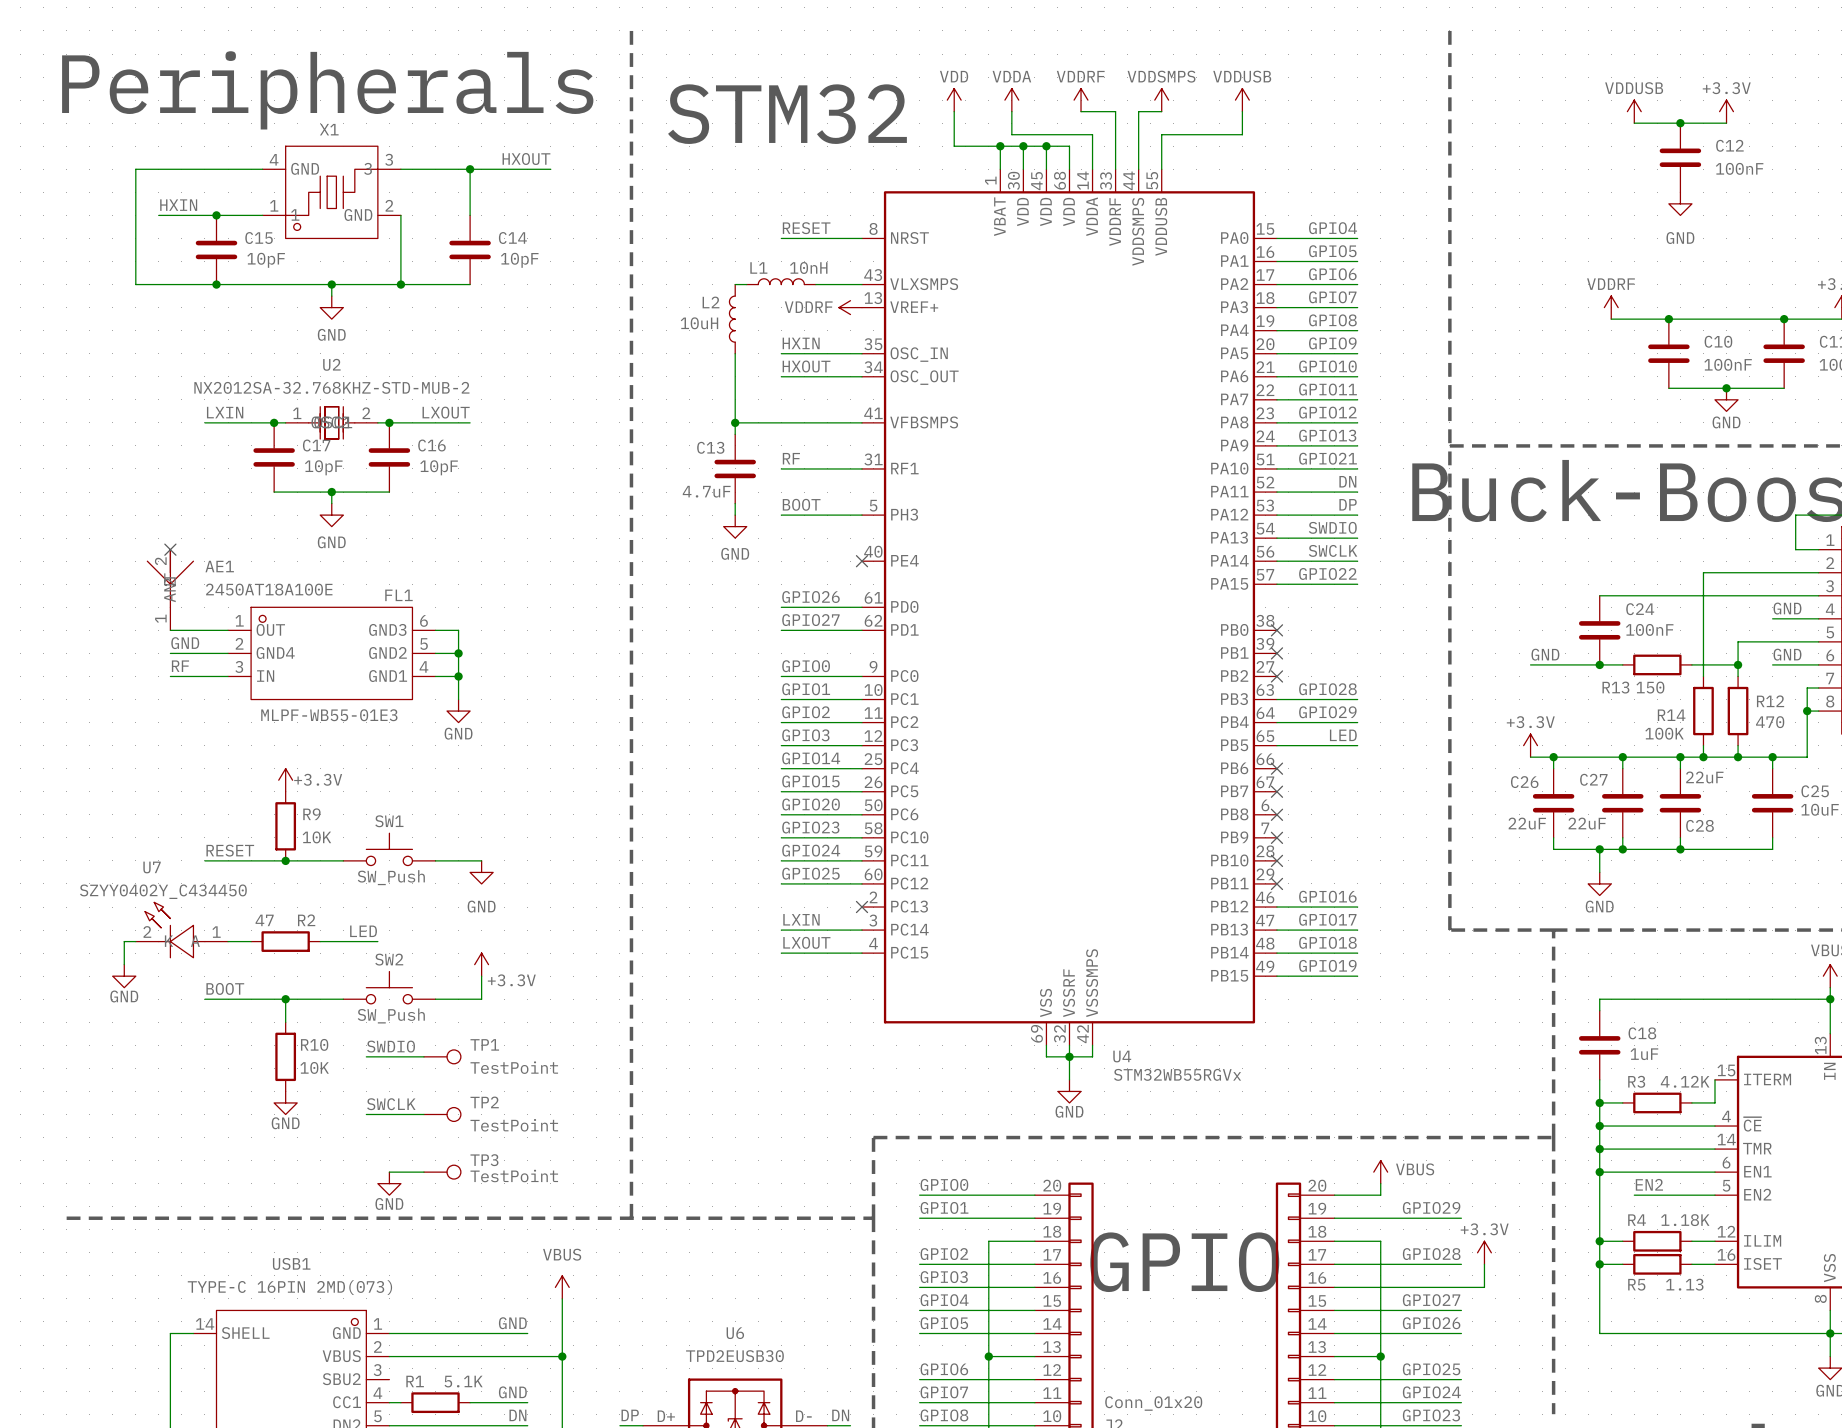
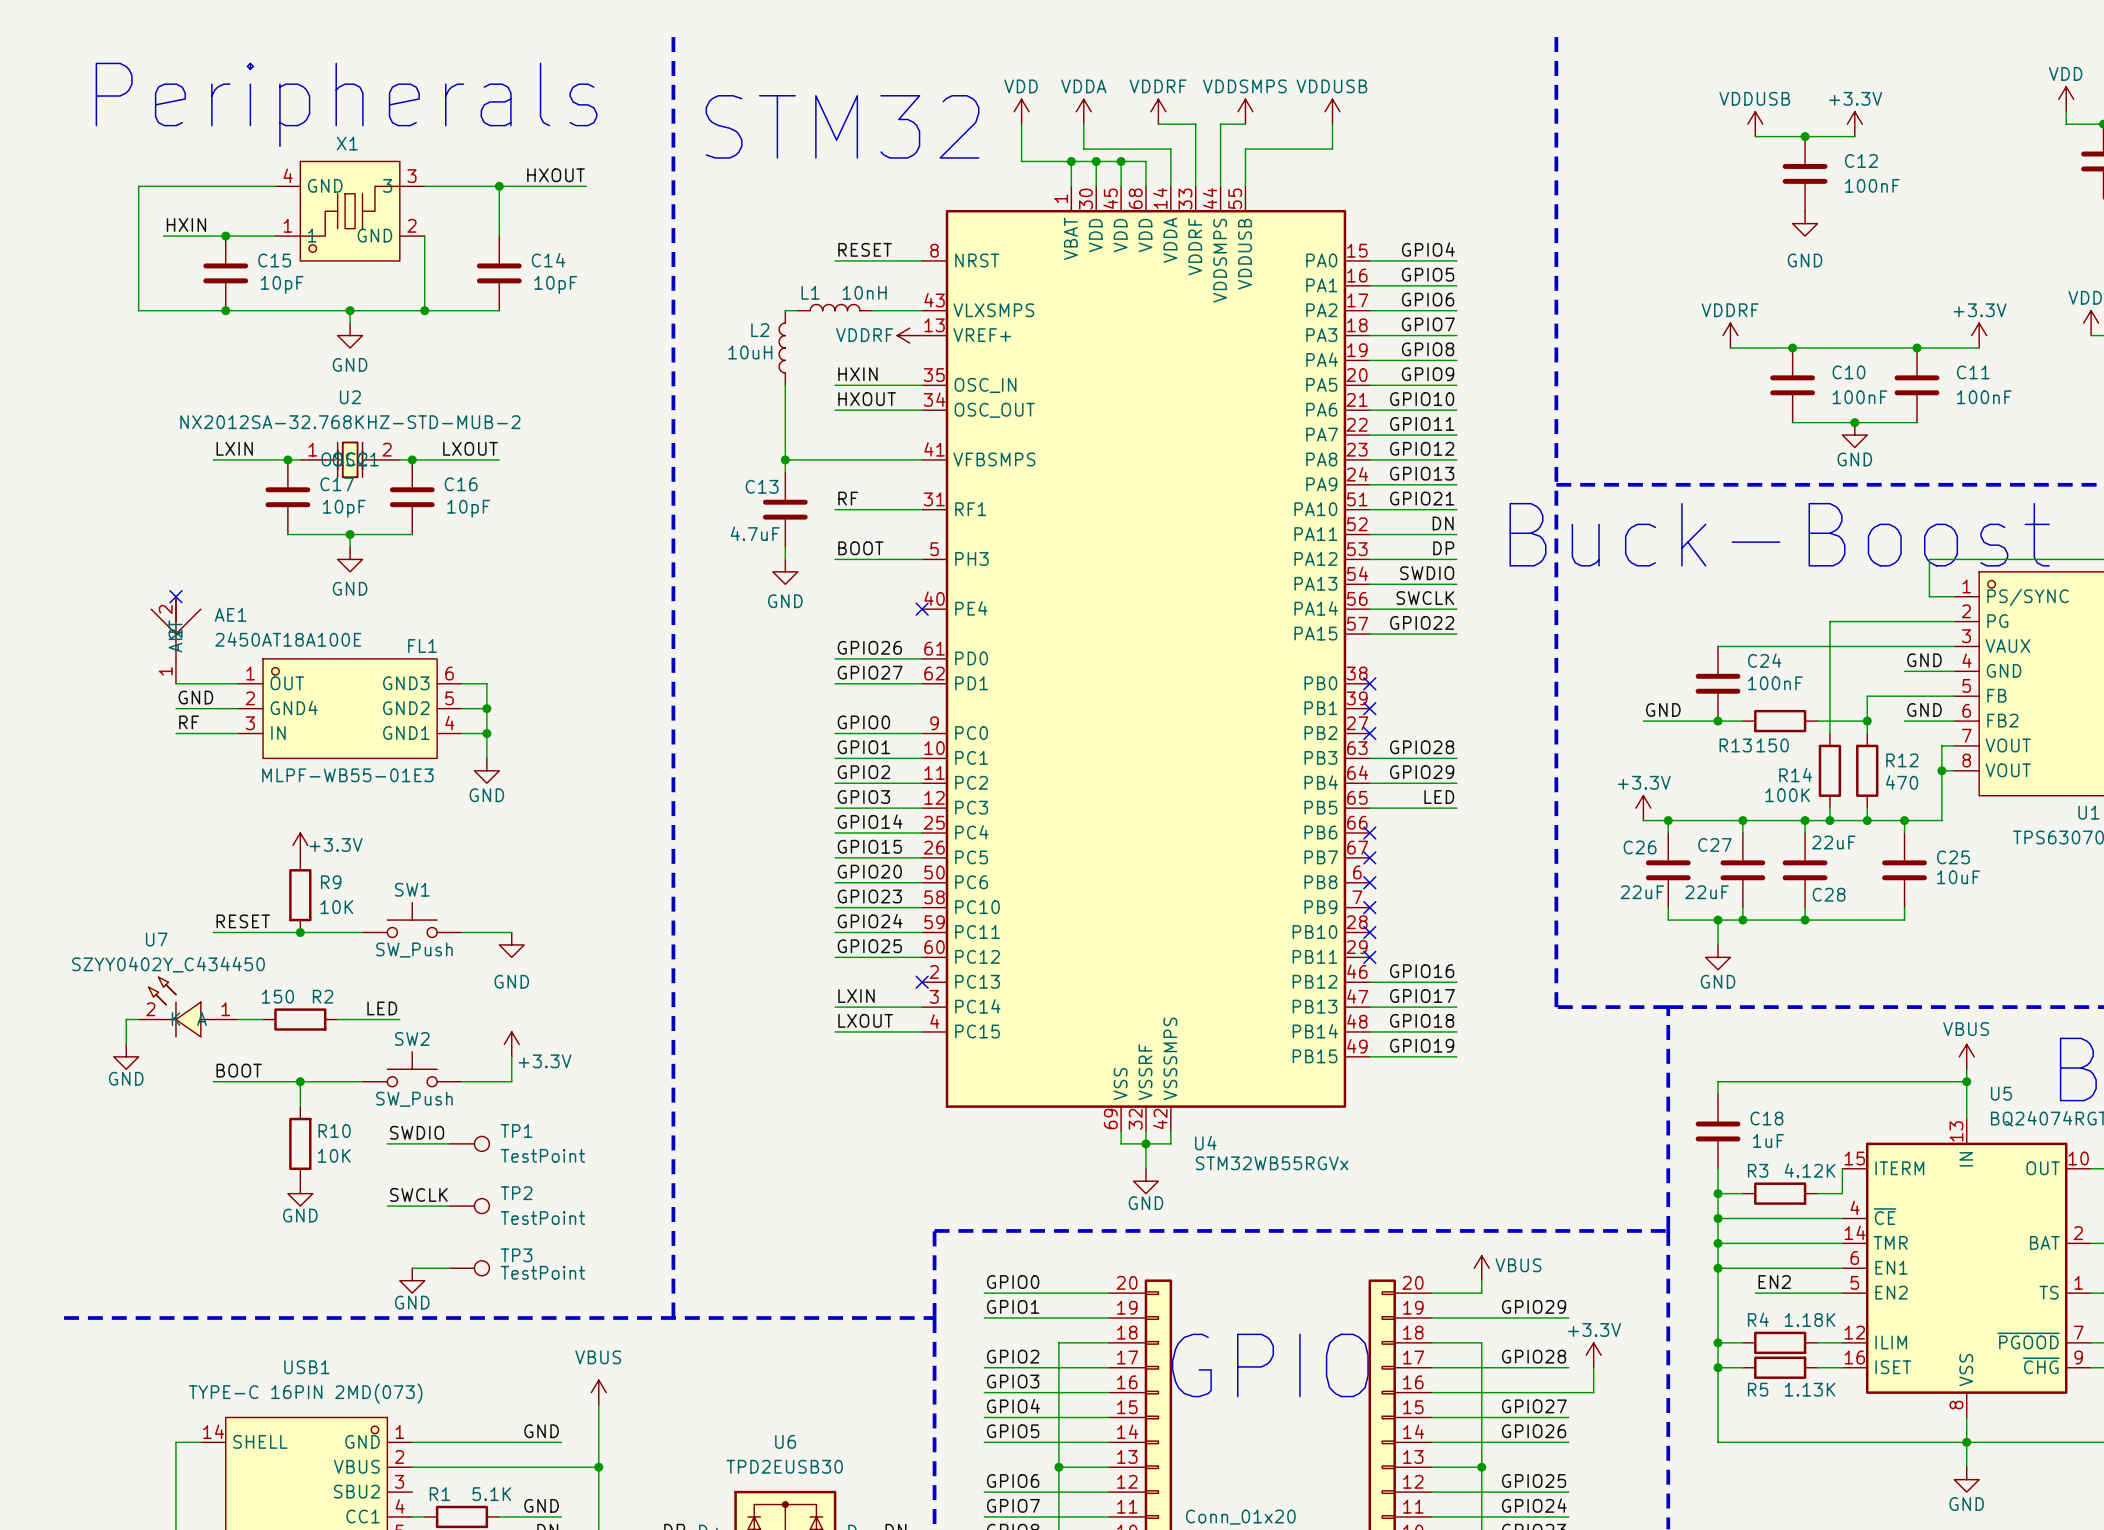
R2 value: 47 (264, 920) -> 150 (277, 996)
R5 value: 1.13 (1684, 1284) -> 1.13K (1810, 1389)

